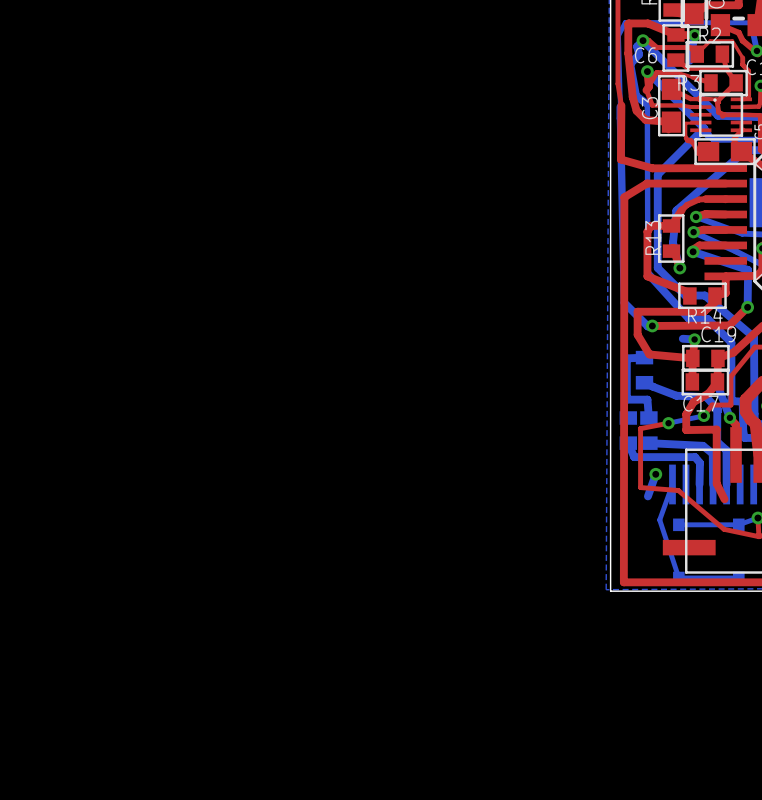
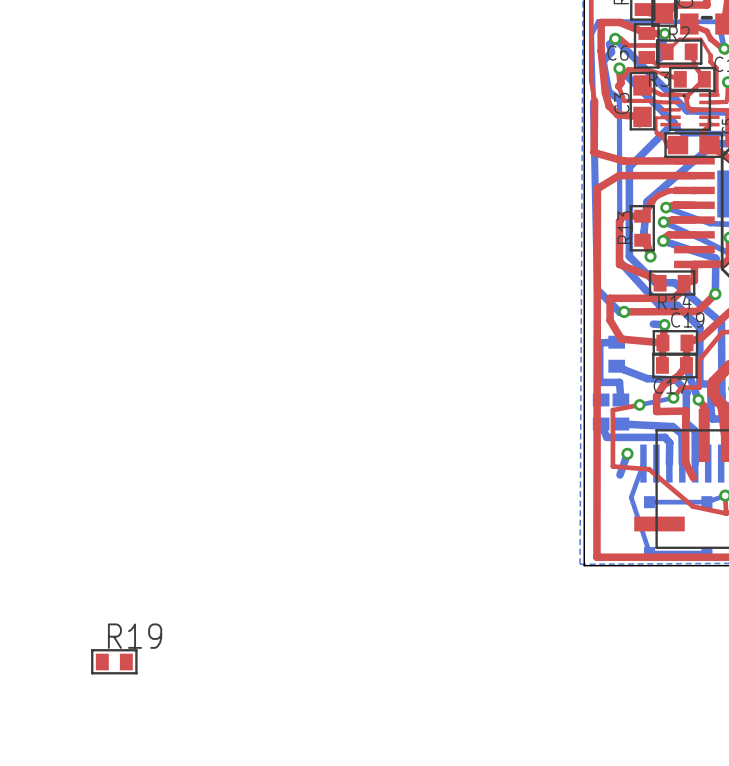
R19: none -> (114, 661)

